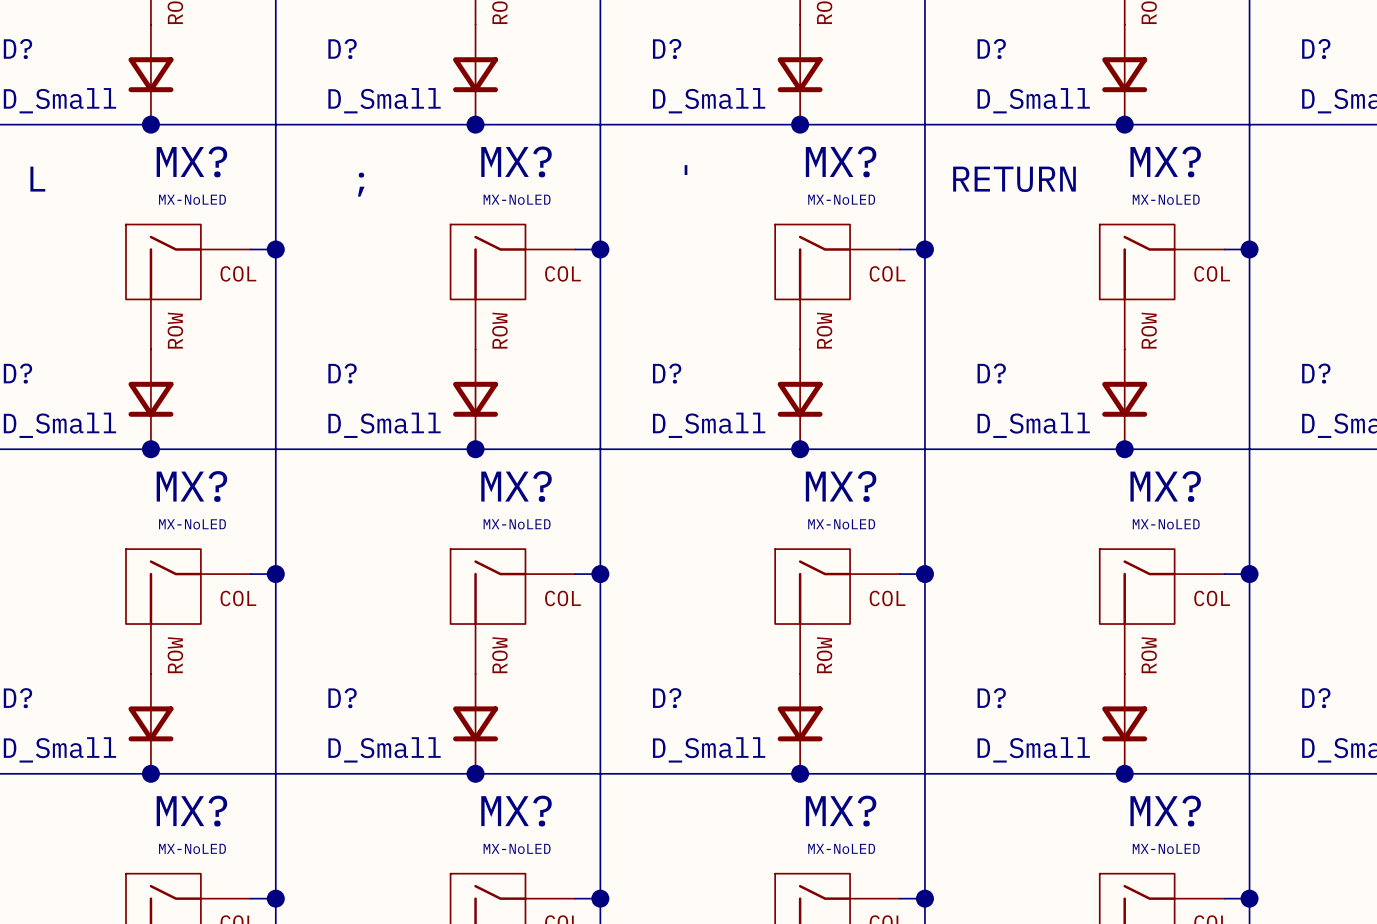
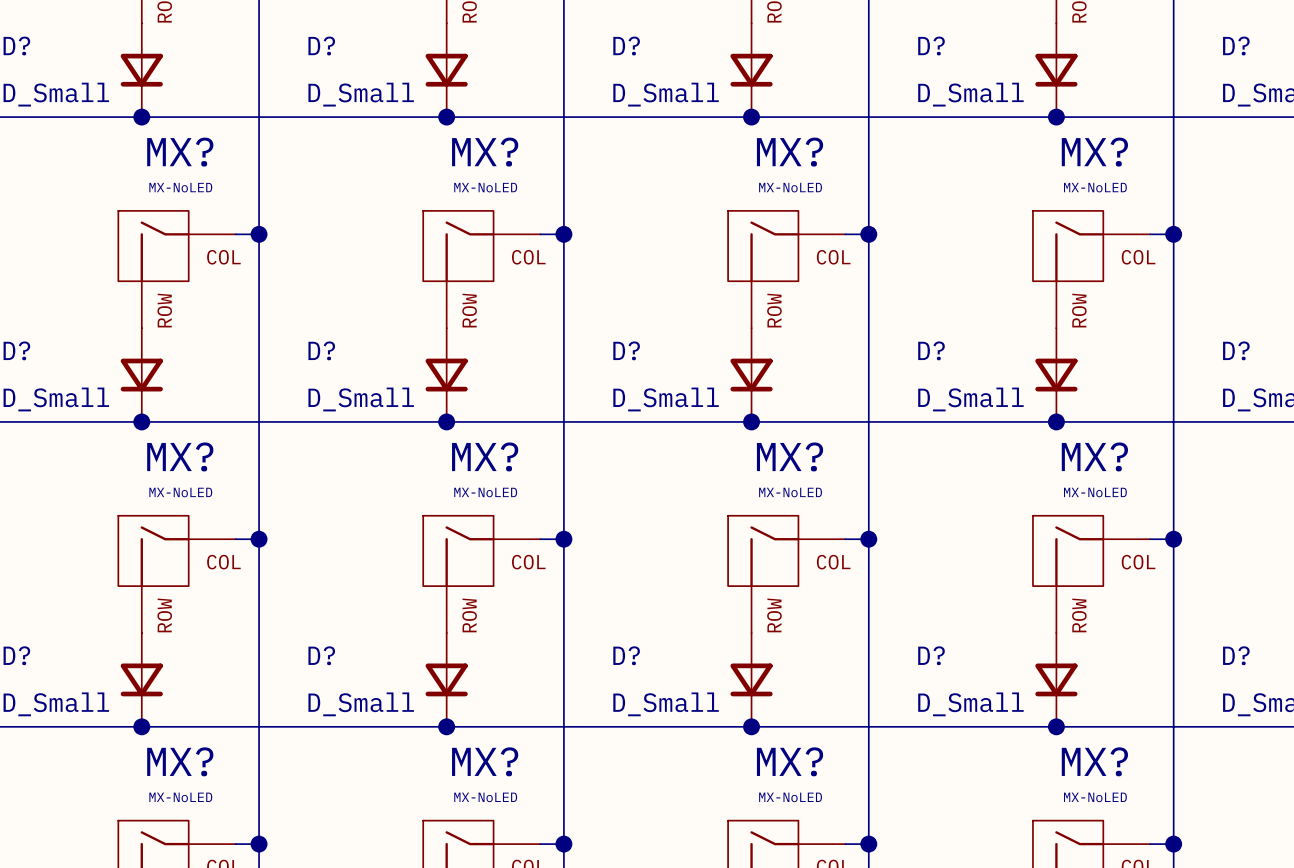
text: ' (686, 170) -> none
text: L (37, 179) -> none
text: RETURN (1014, 179) -> none
text: ; (361, 184) -> none

